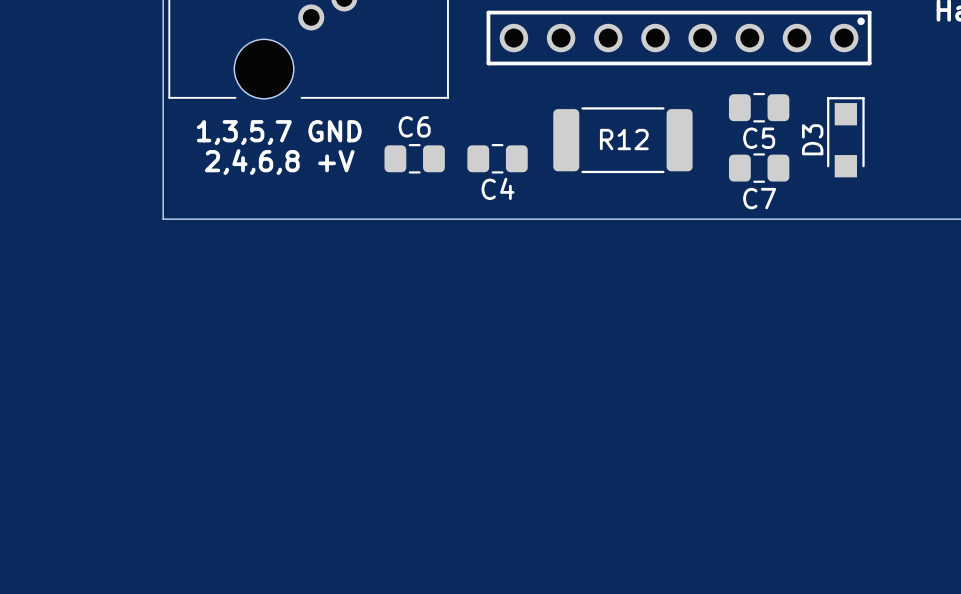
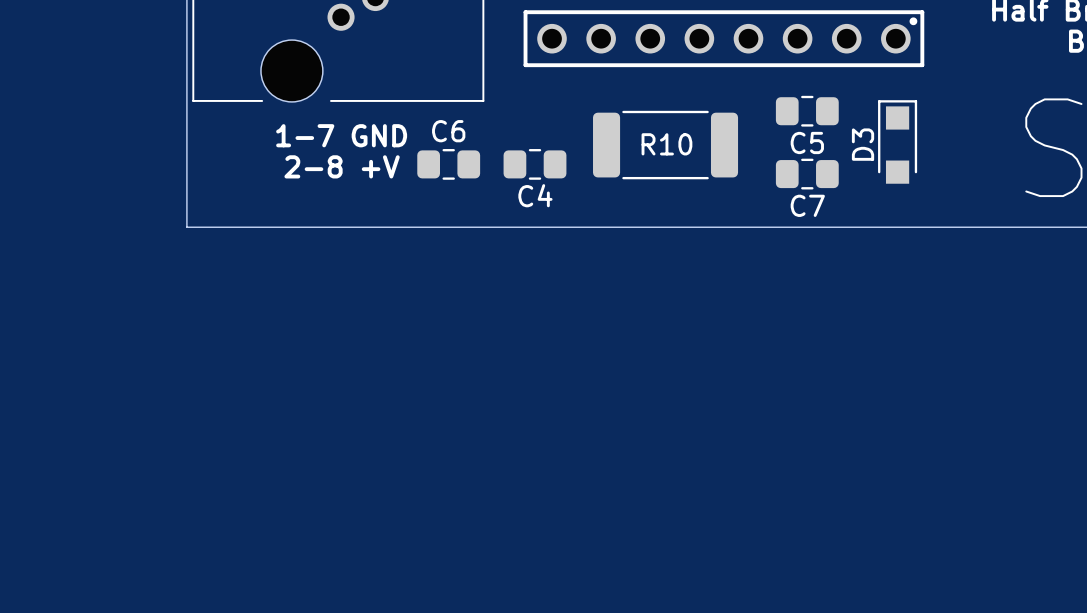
text: 1,3,5,7 GND (279, 132) -> 1-7 GND (341, 135)
R12 name: R12 (624, 139) -> R10 (666, 144)
text: 2,4,6,8 +V (279, 162) -> 2-8 +V (342, 166)

